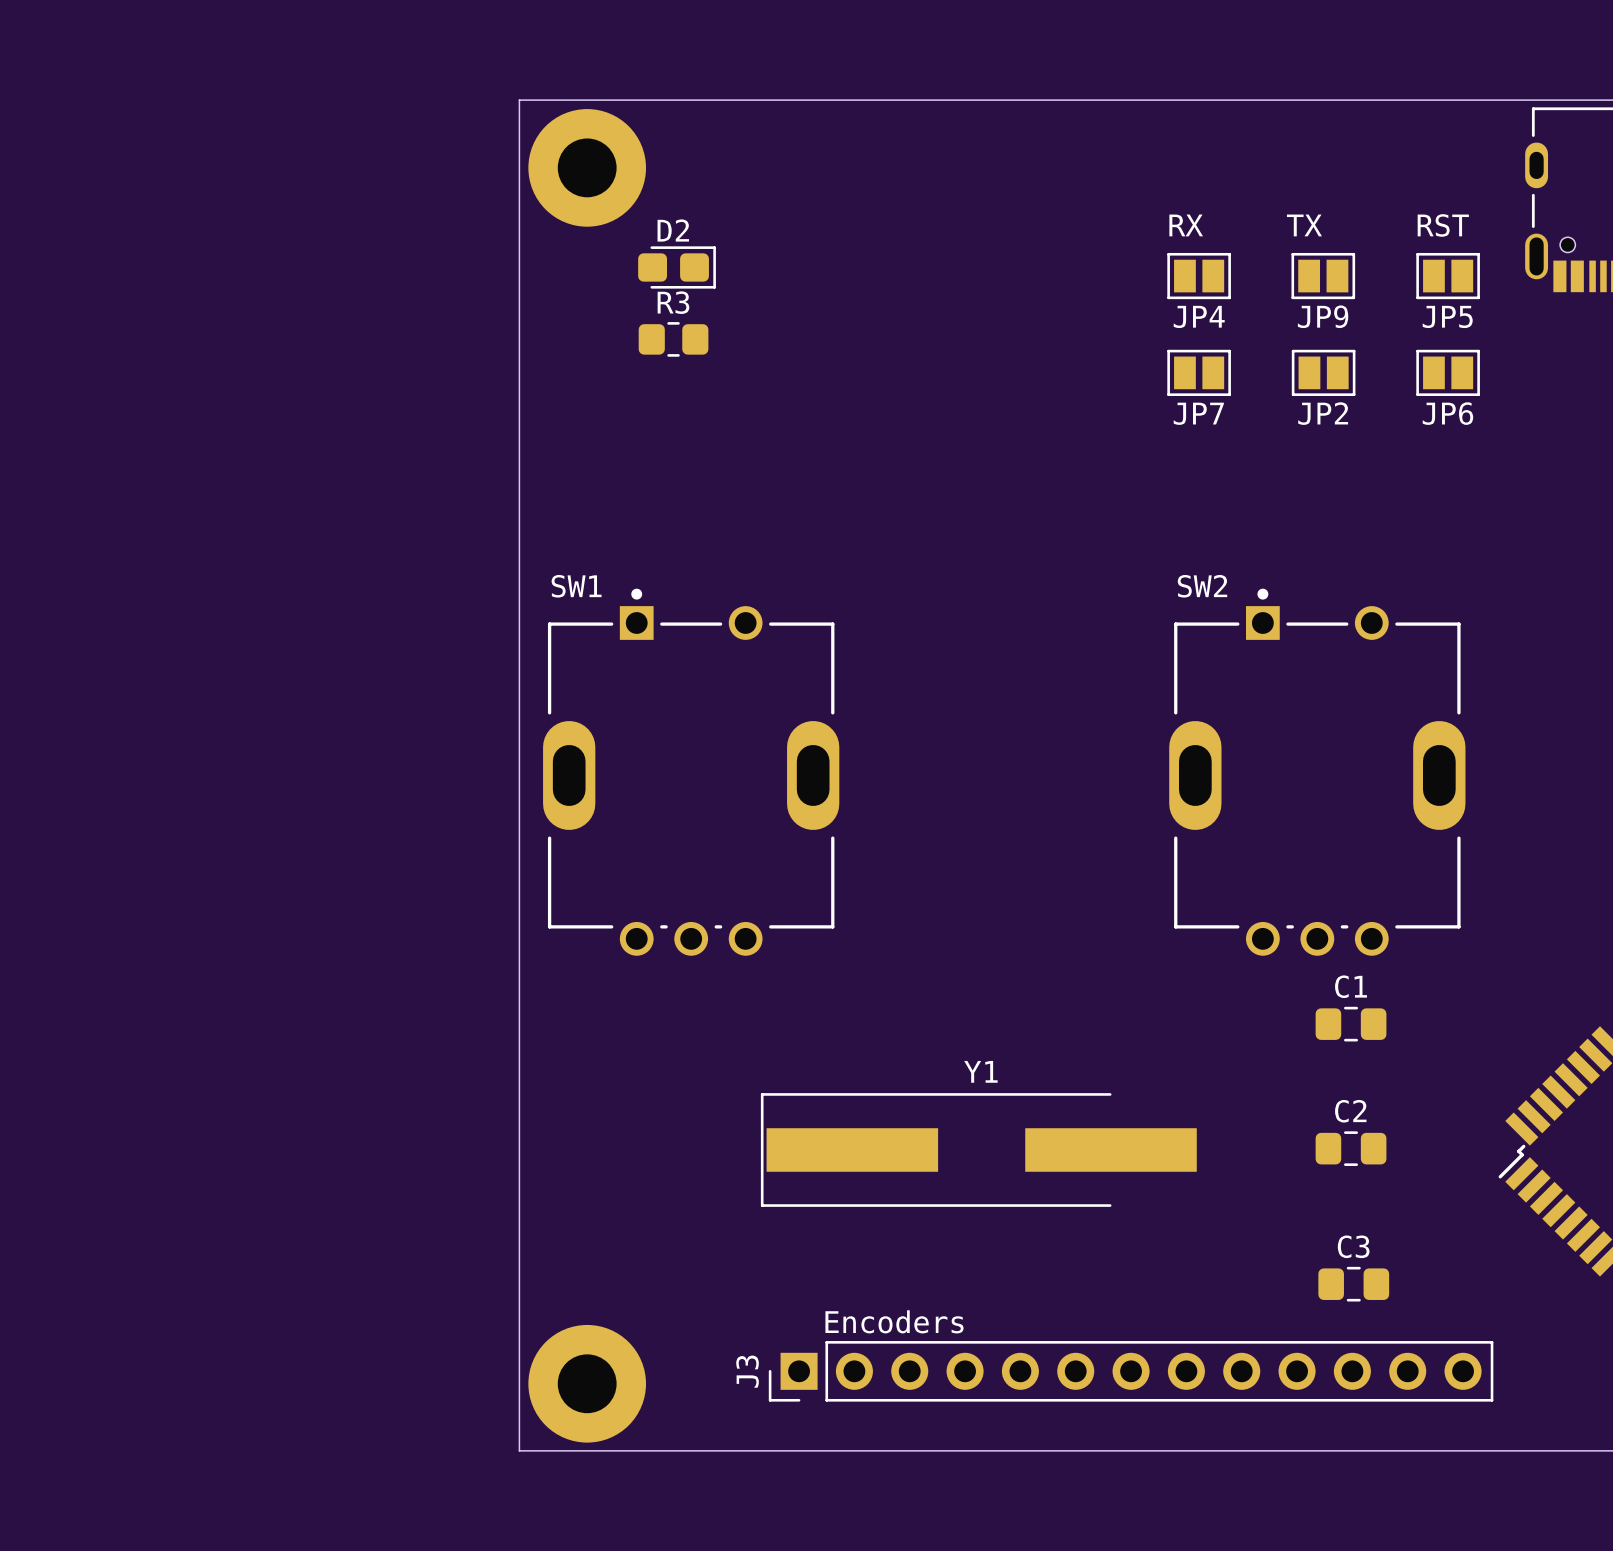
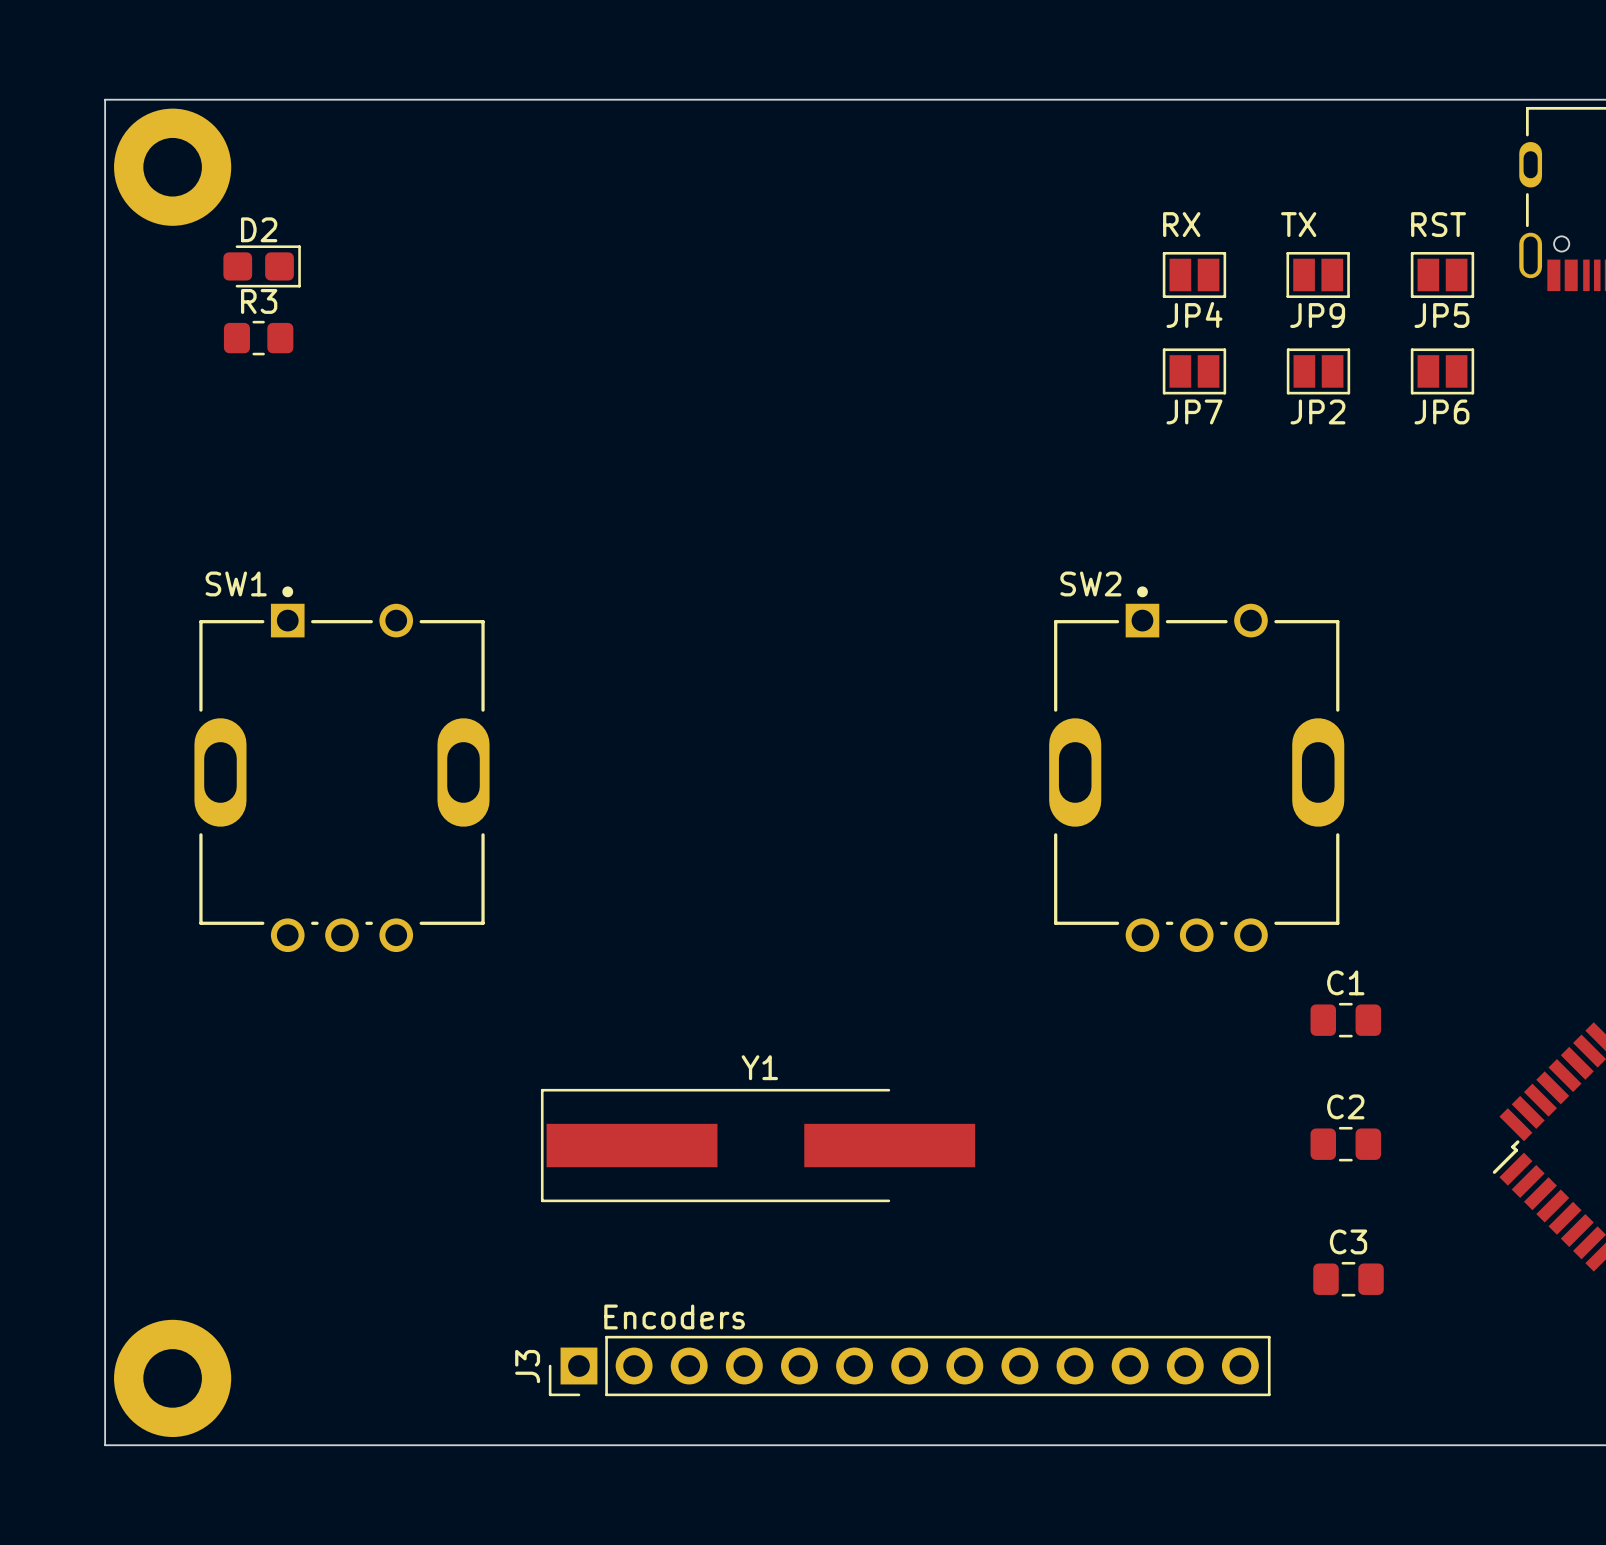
board edge: (519, 100) (519, 1450) -> (517, 99) (105, 99) (105, 1445) (517, 1445)
part position: (587, 167) -> (172, 167)
D2 position: (677, 267) -> (262, 266)
R3 position: (673, 339) -> (258, 338)
SW1 position: (691, 772) -> (341, 769)
SW2 position: (1317, 772) -> (1196, 769)
Y1 position: (978, 1149) -> (758, 1145)
text position: Encoders (894, 1321) -> Encoders (674, 1316)
J3 position: (1131, 1371) -> (909, 1366)
part position: (587, 1383) -> (172, 1378)

